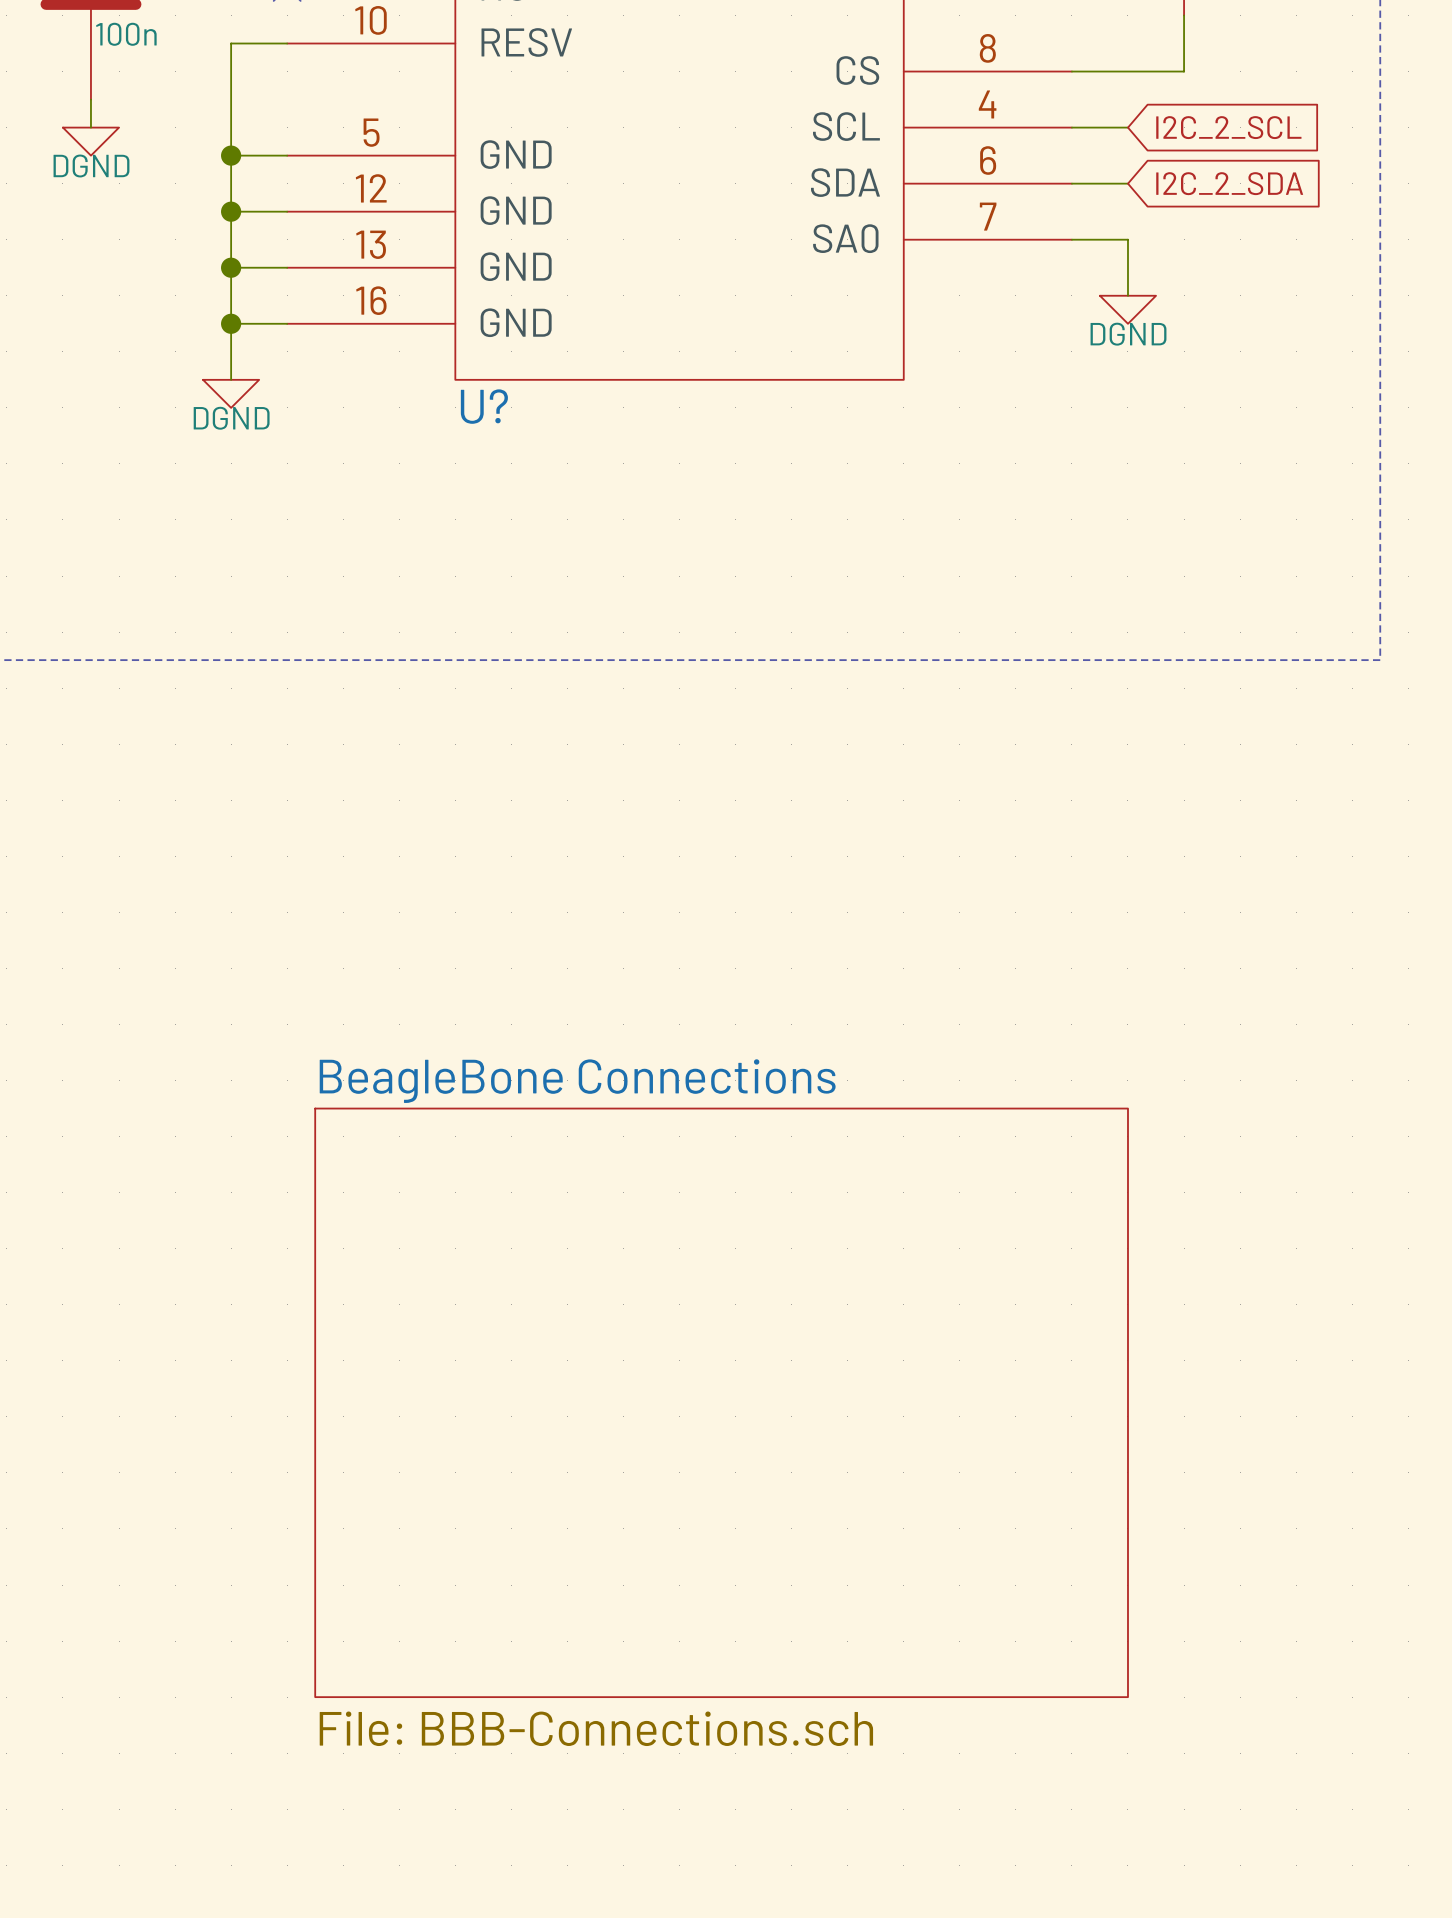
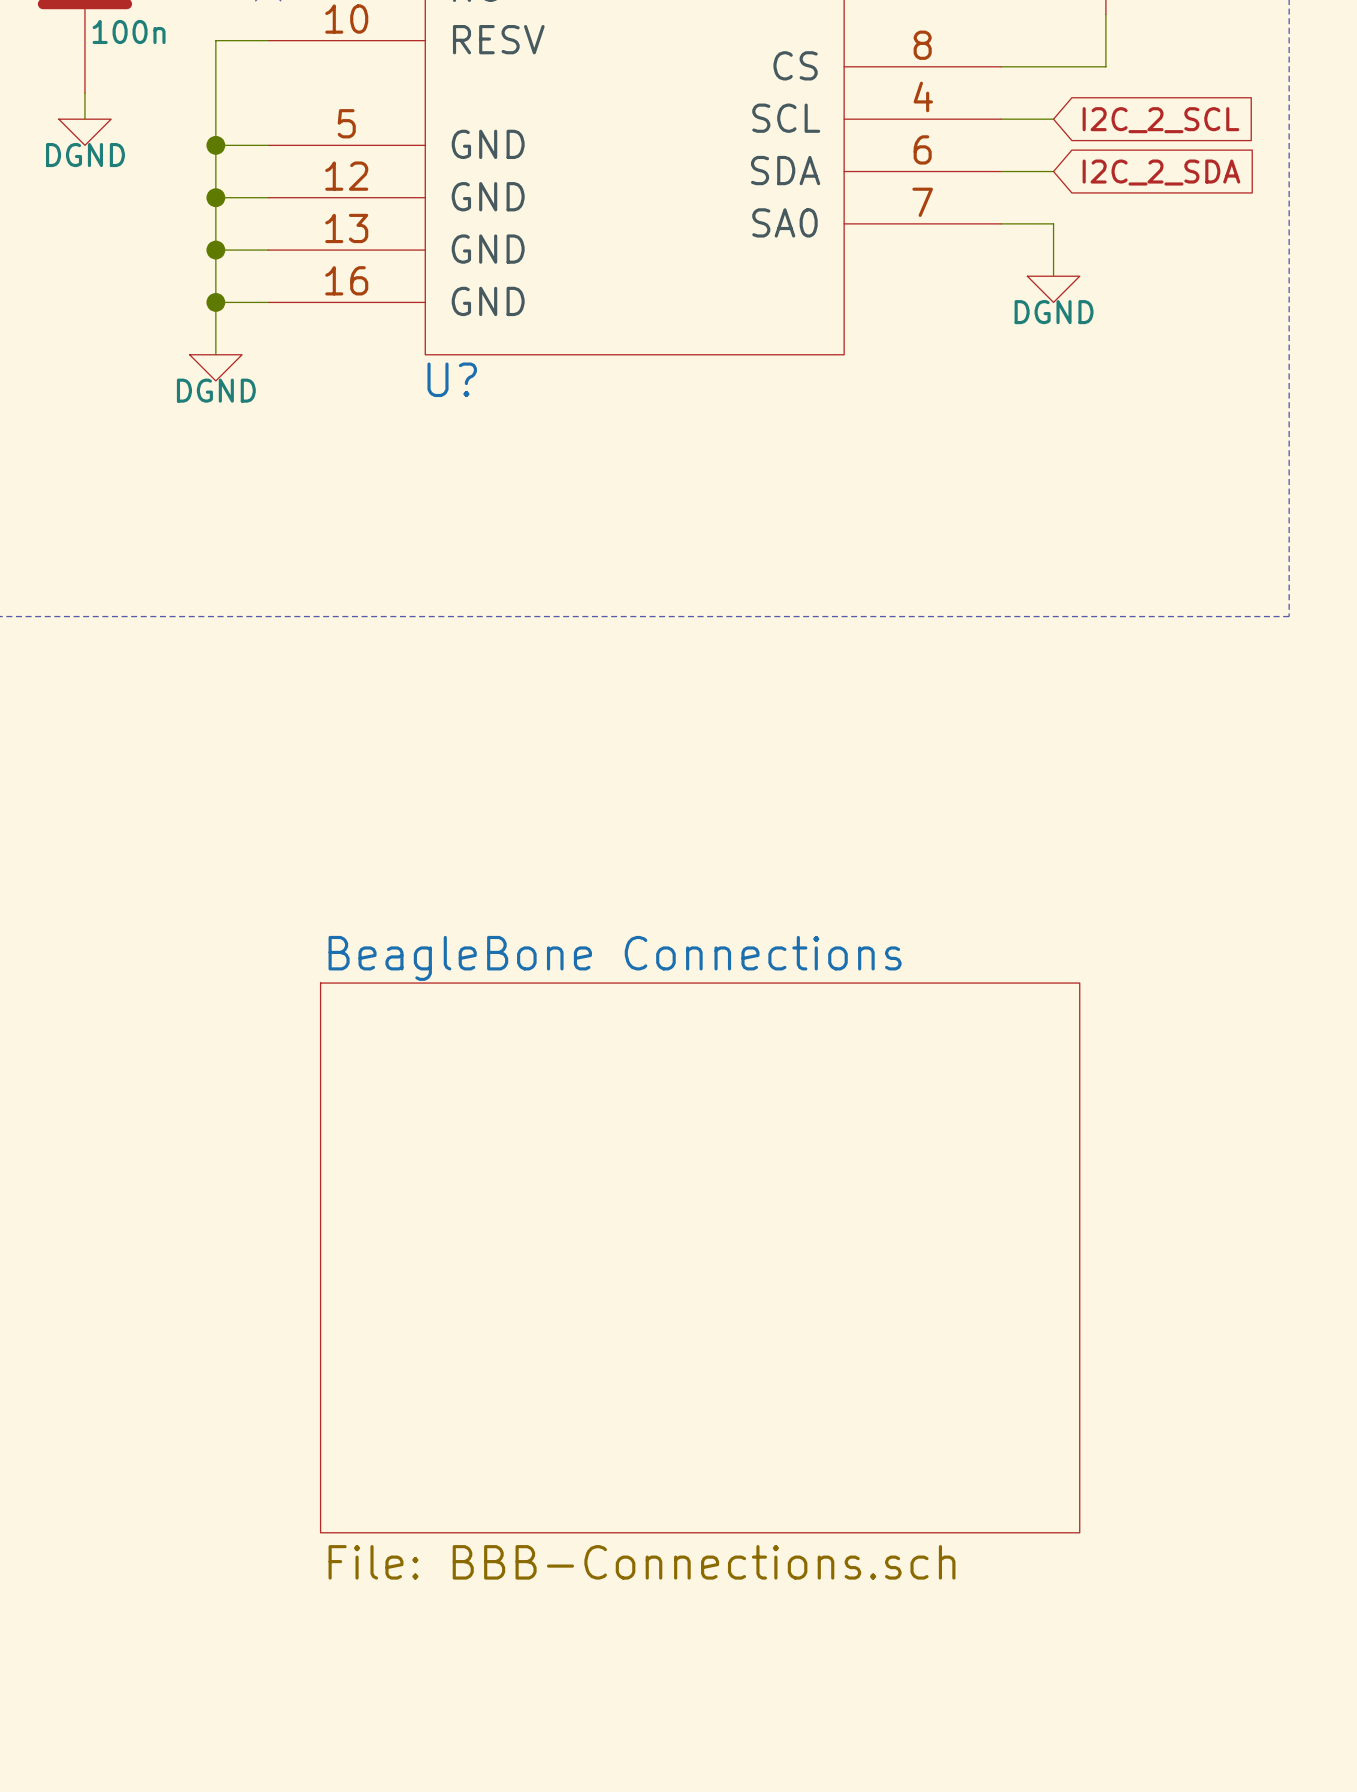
sheet BeagleBone Connections position: (721, 1402) -> (700, 1257)

